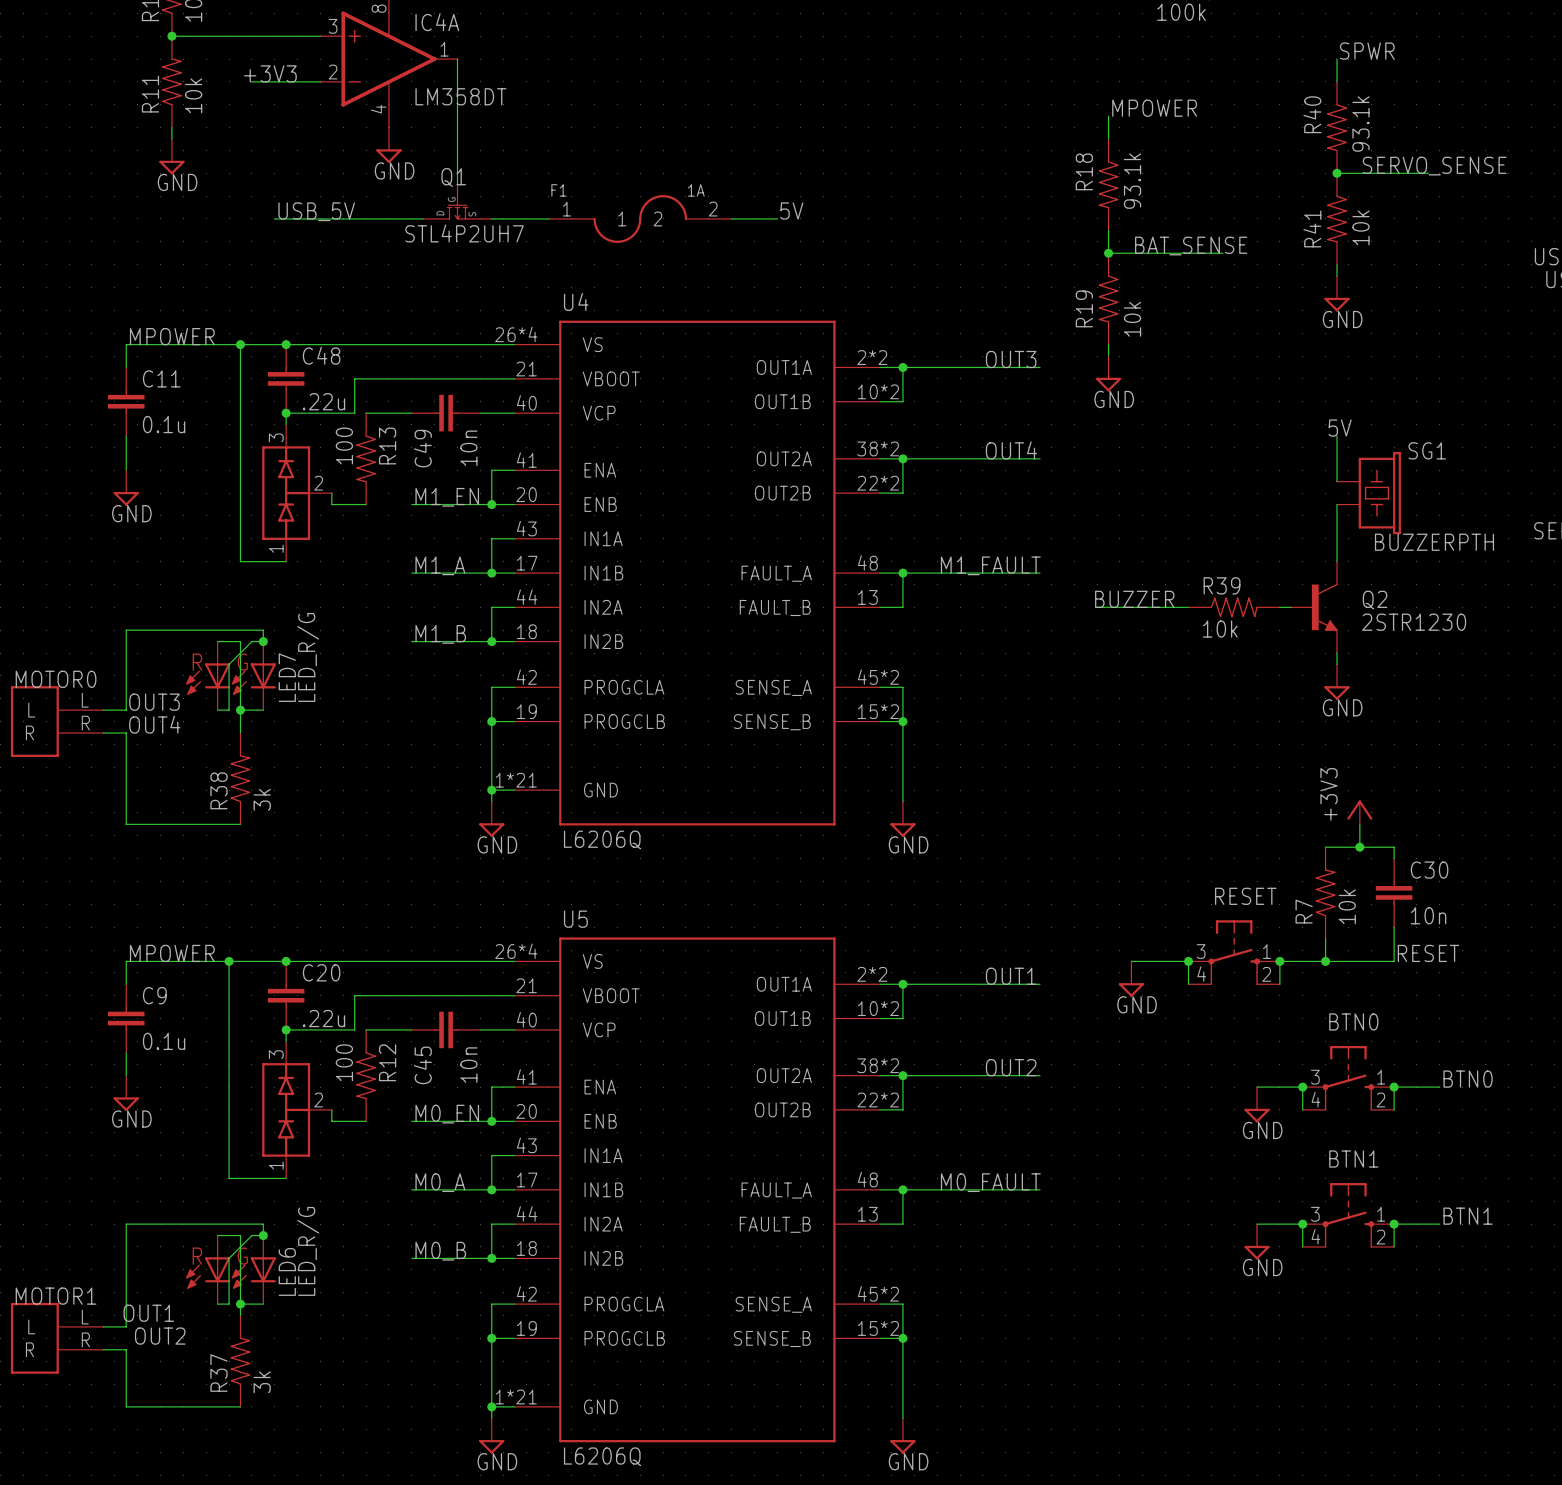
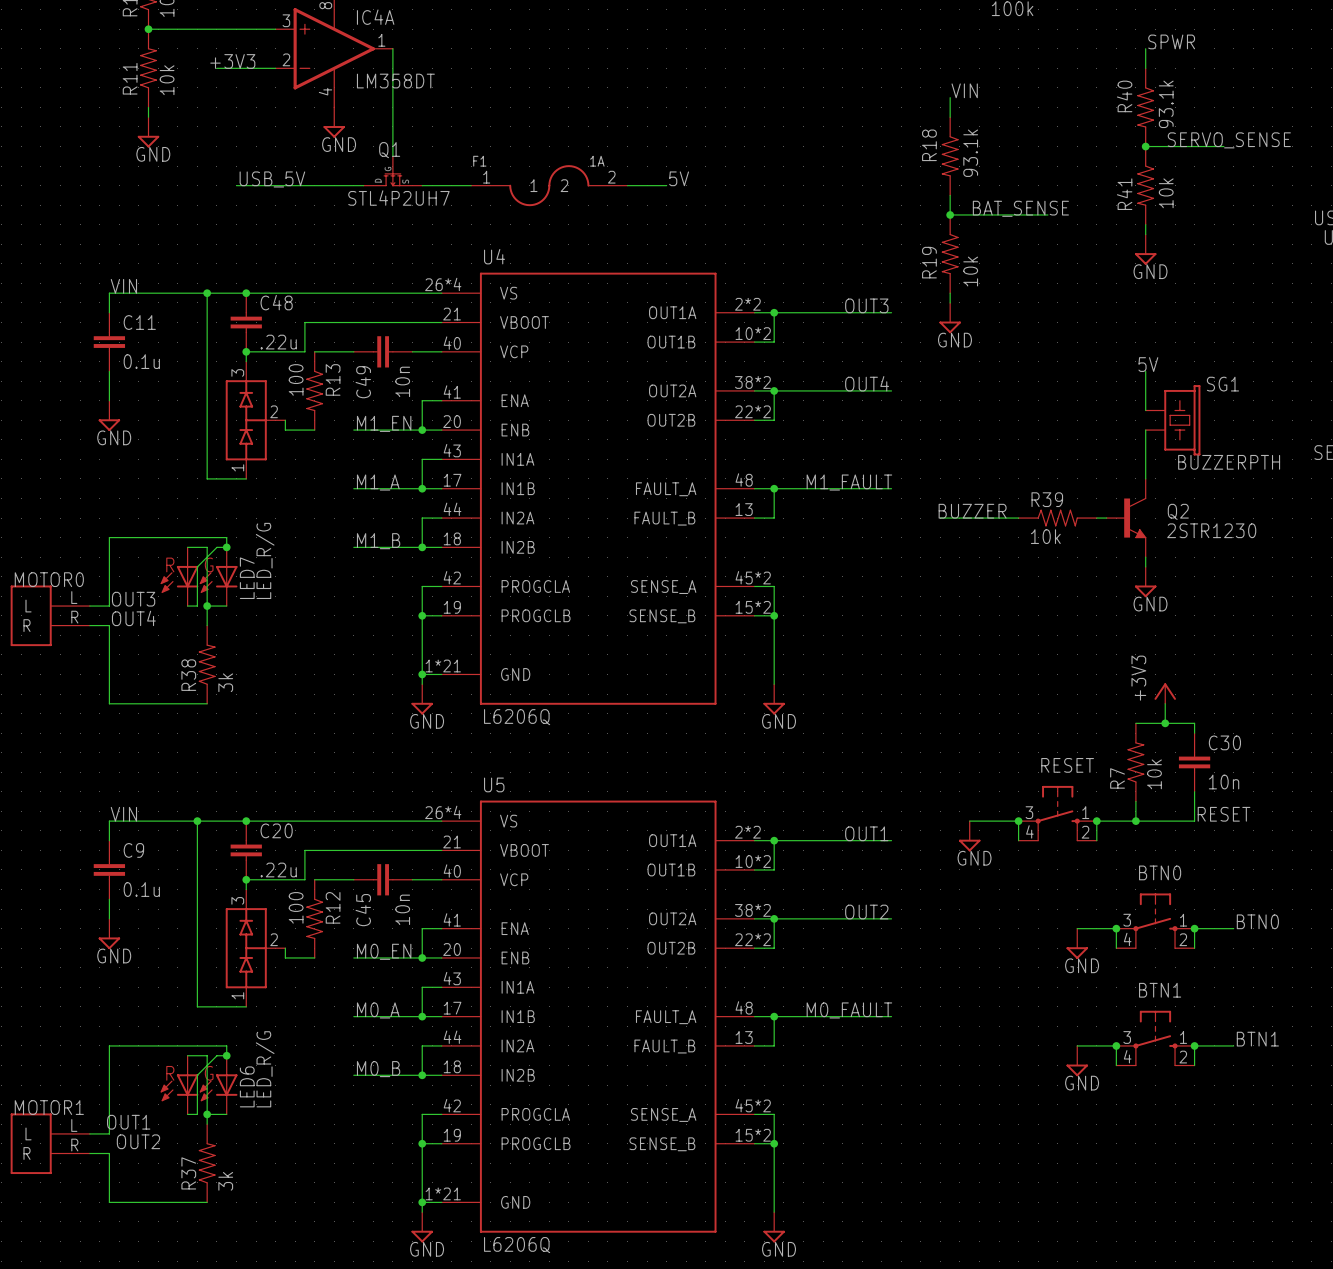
label: MPOWER (1154, 108) -> VIN (964, 90)
label: MPOWER (172, 336) -> VIN (123, 286)
label: MPOWER (172, 953) -> VIN (123, 814)

